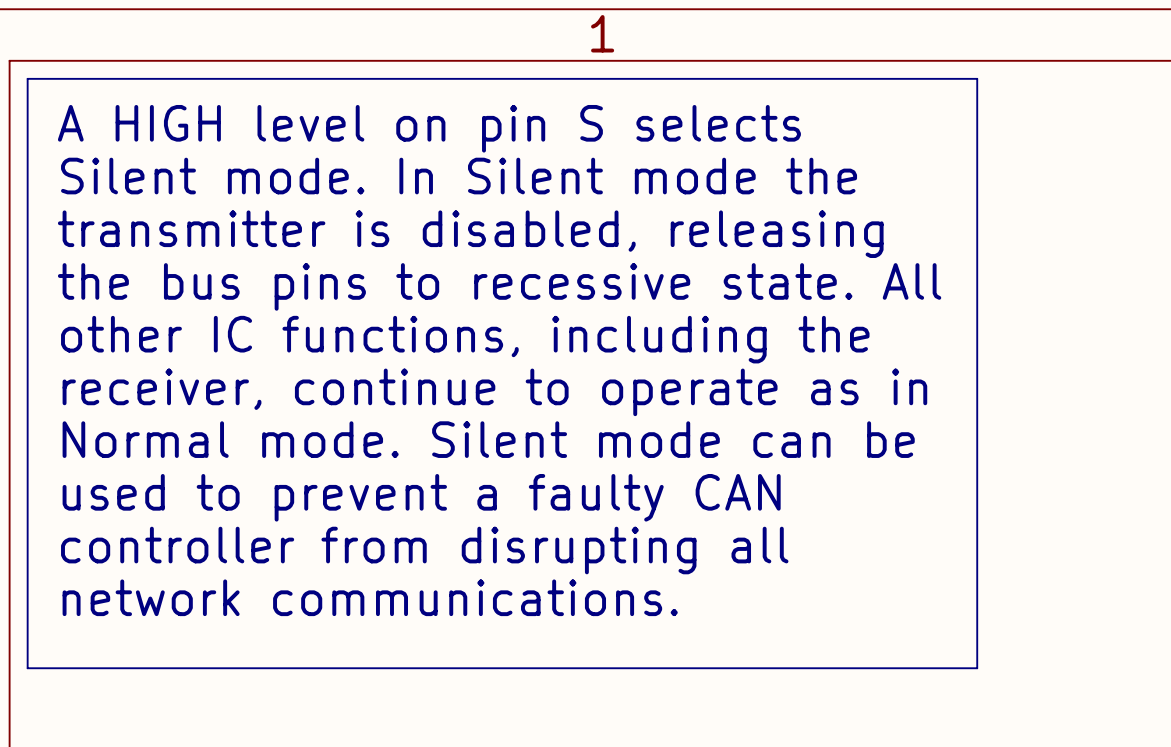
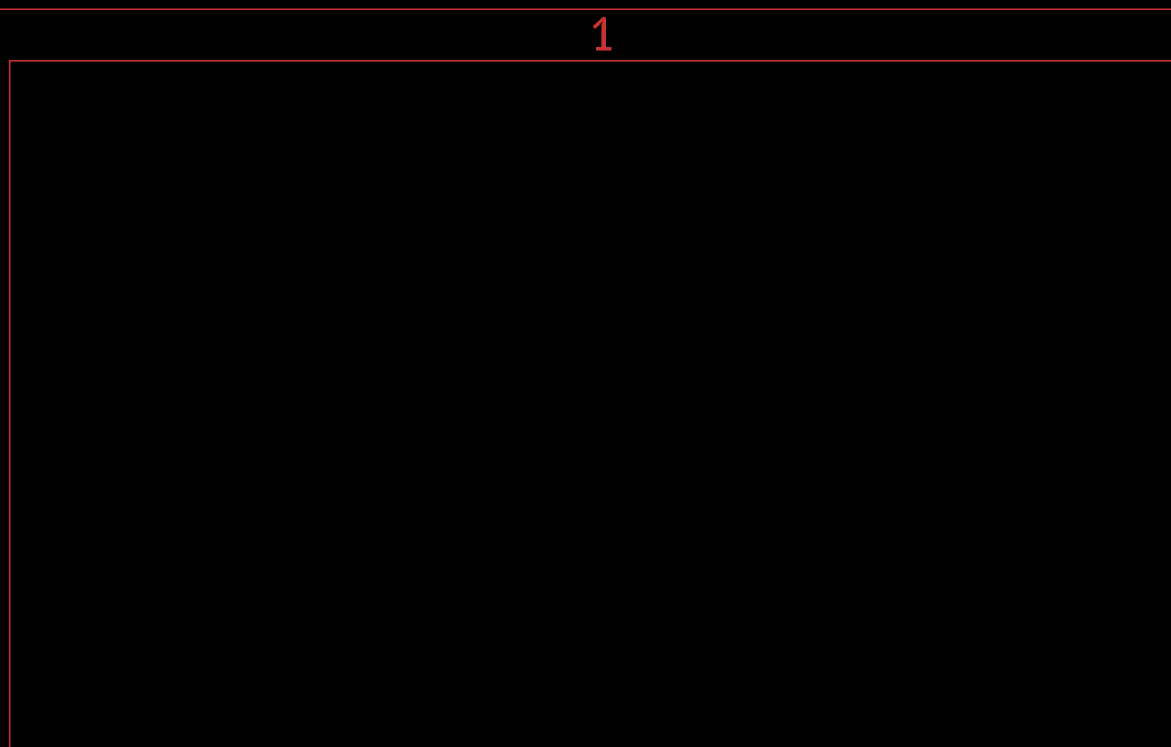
line: (27, 78) (977, 78) (977, 668) (27, 668) (27, 78) -> none
text: A HIGH level on pin S selects (429, 128) -> none
text: Silent mode. In Silent mode the (459, 176) -> none
text: transmitter is disabled, releasing (470, 234) -> none
text: the bus pins to recessive state. All (499, 286) -> none
text: other IC functions, including the (465, 339) -> none
text: receiver, continue to operate as in (494, 392) -> none
text: Normal mode. Silent mode can be (488, 439) -> none
text: used to prevent a faulty CAN (421, 497) -> none
text: controller from disrupting all (424, 550) -> none
text: network communications. (370, 597) -> none

